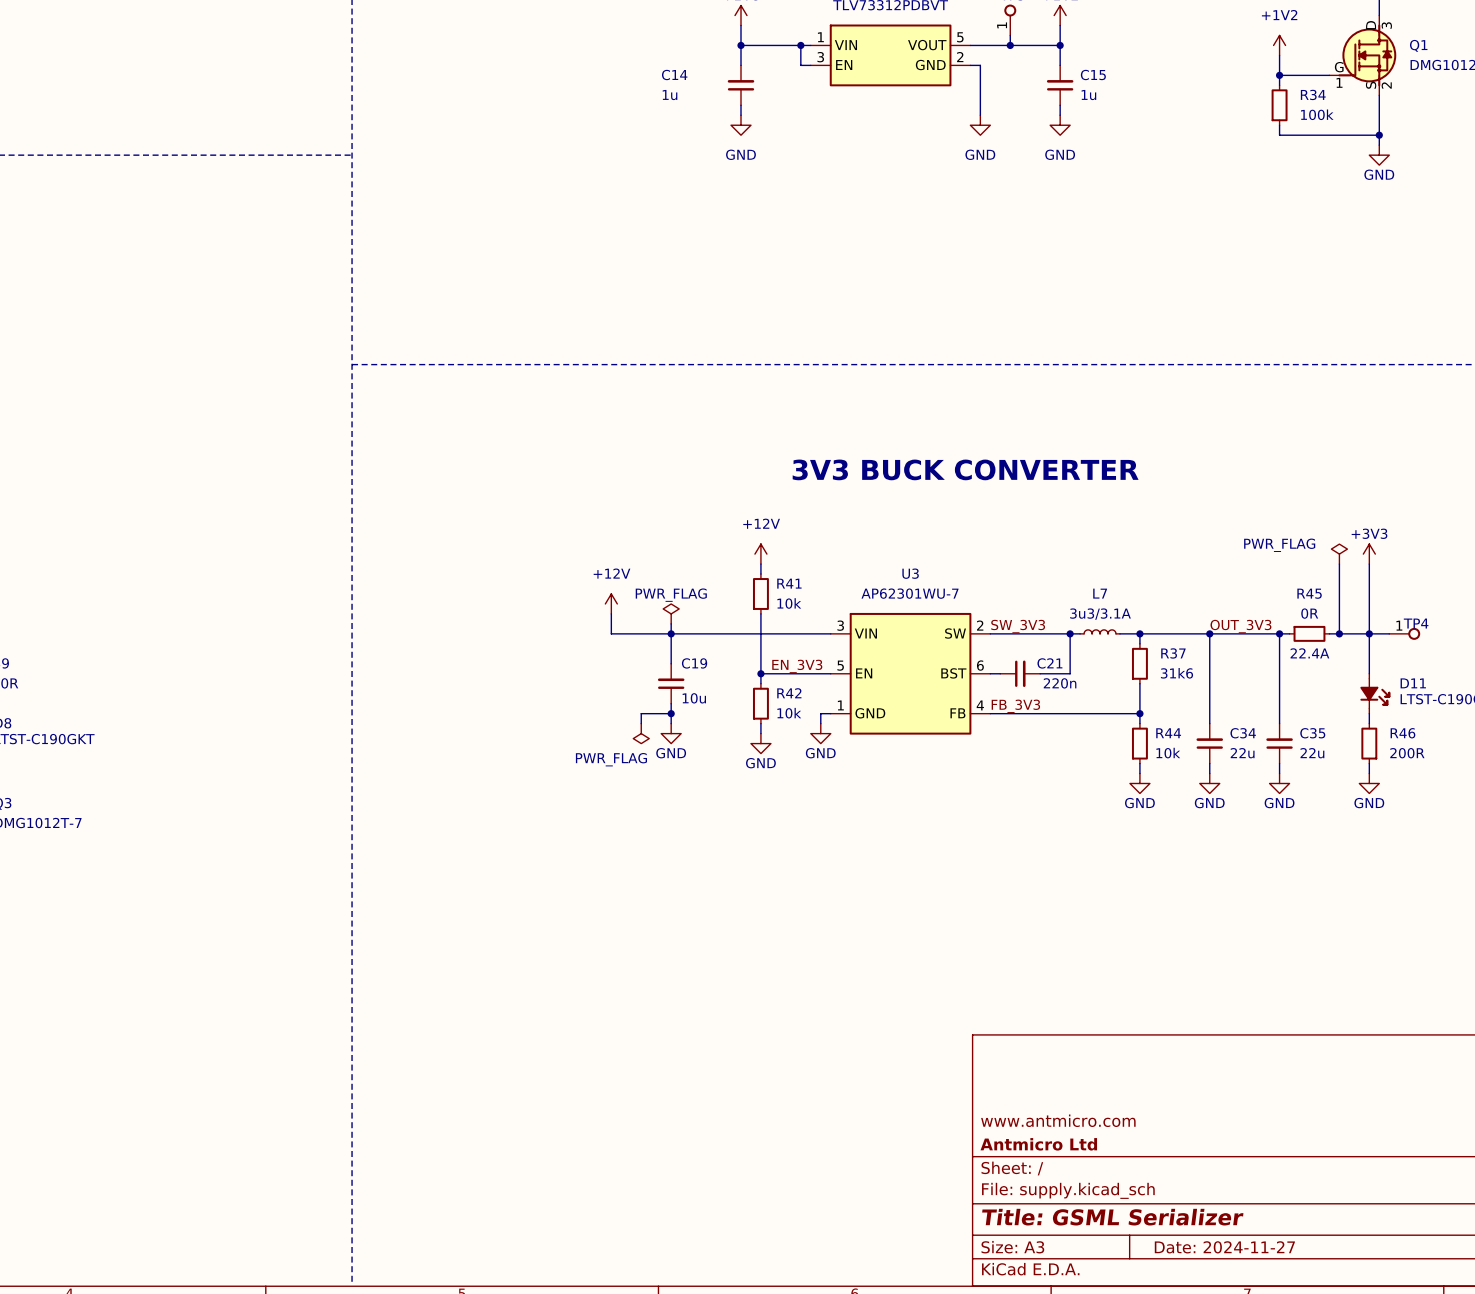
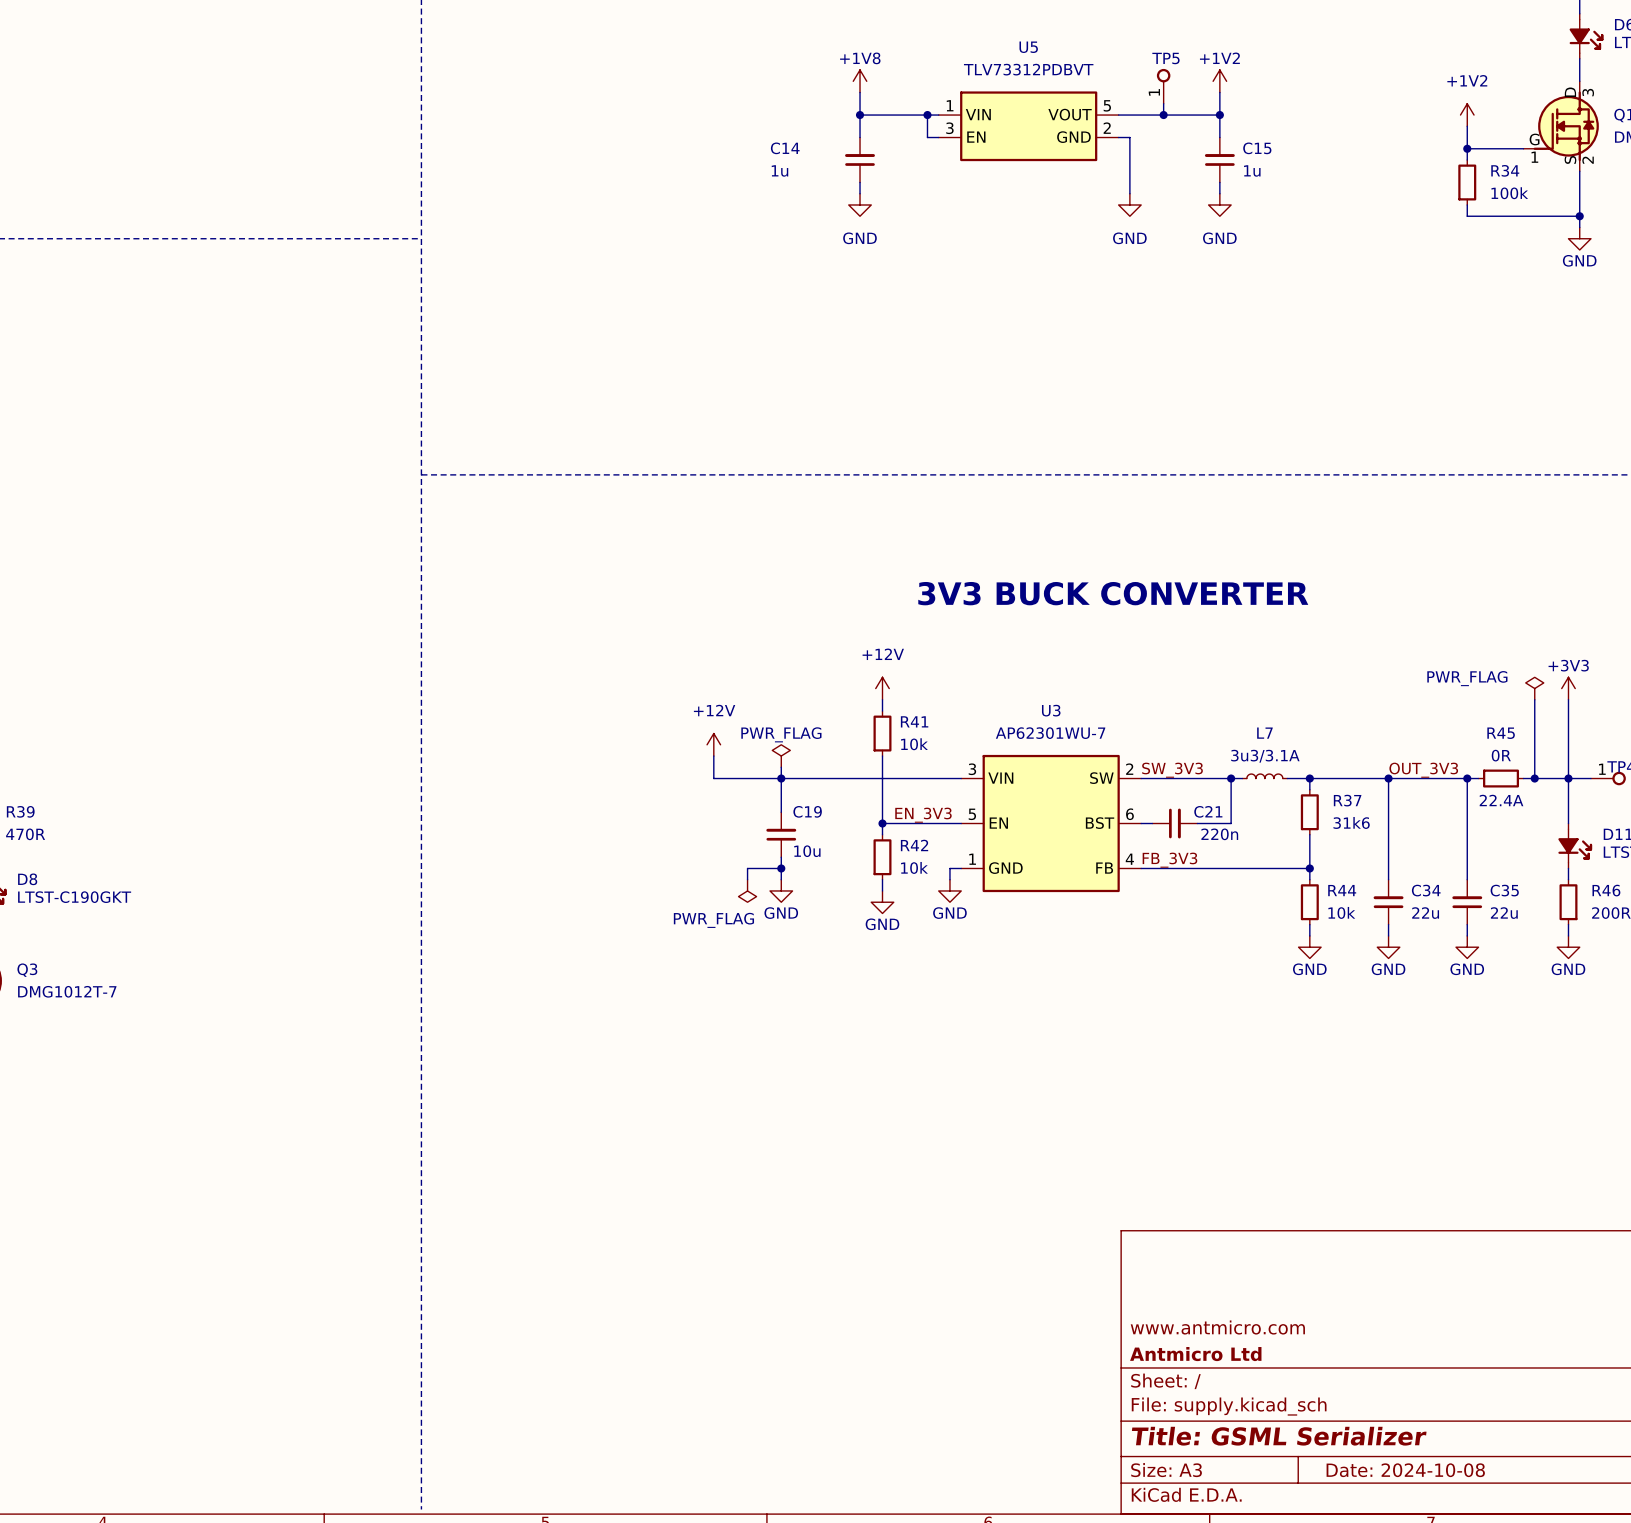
title block: Date: 2024-11-27 (1224, 1247) -> Date: 2024-10-08 (1405, 1470)

